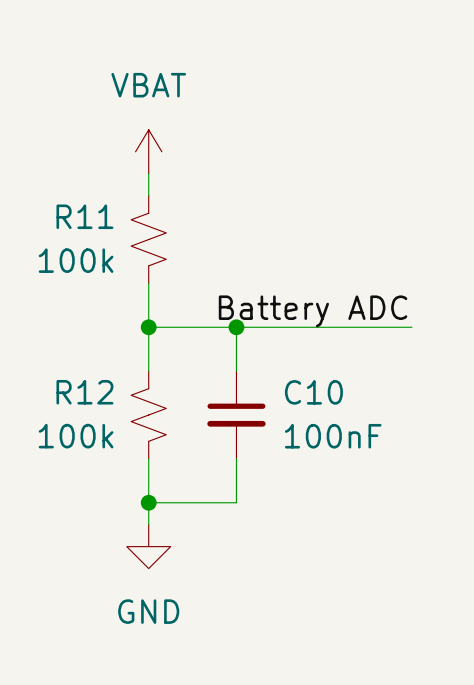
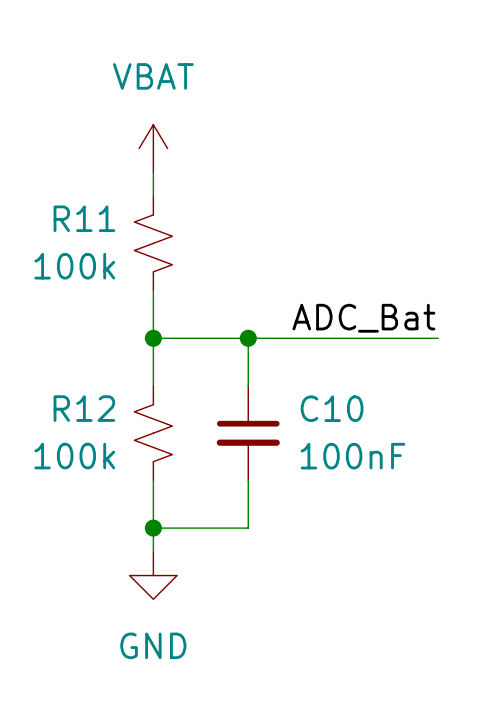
label: Battery ADC (313, 311) -> ADC_Bat (363, 318)

